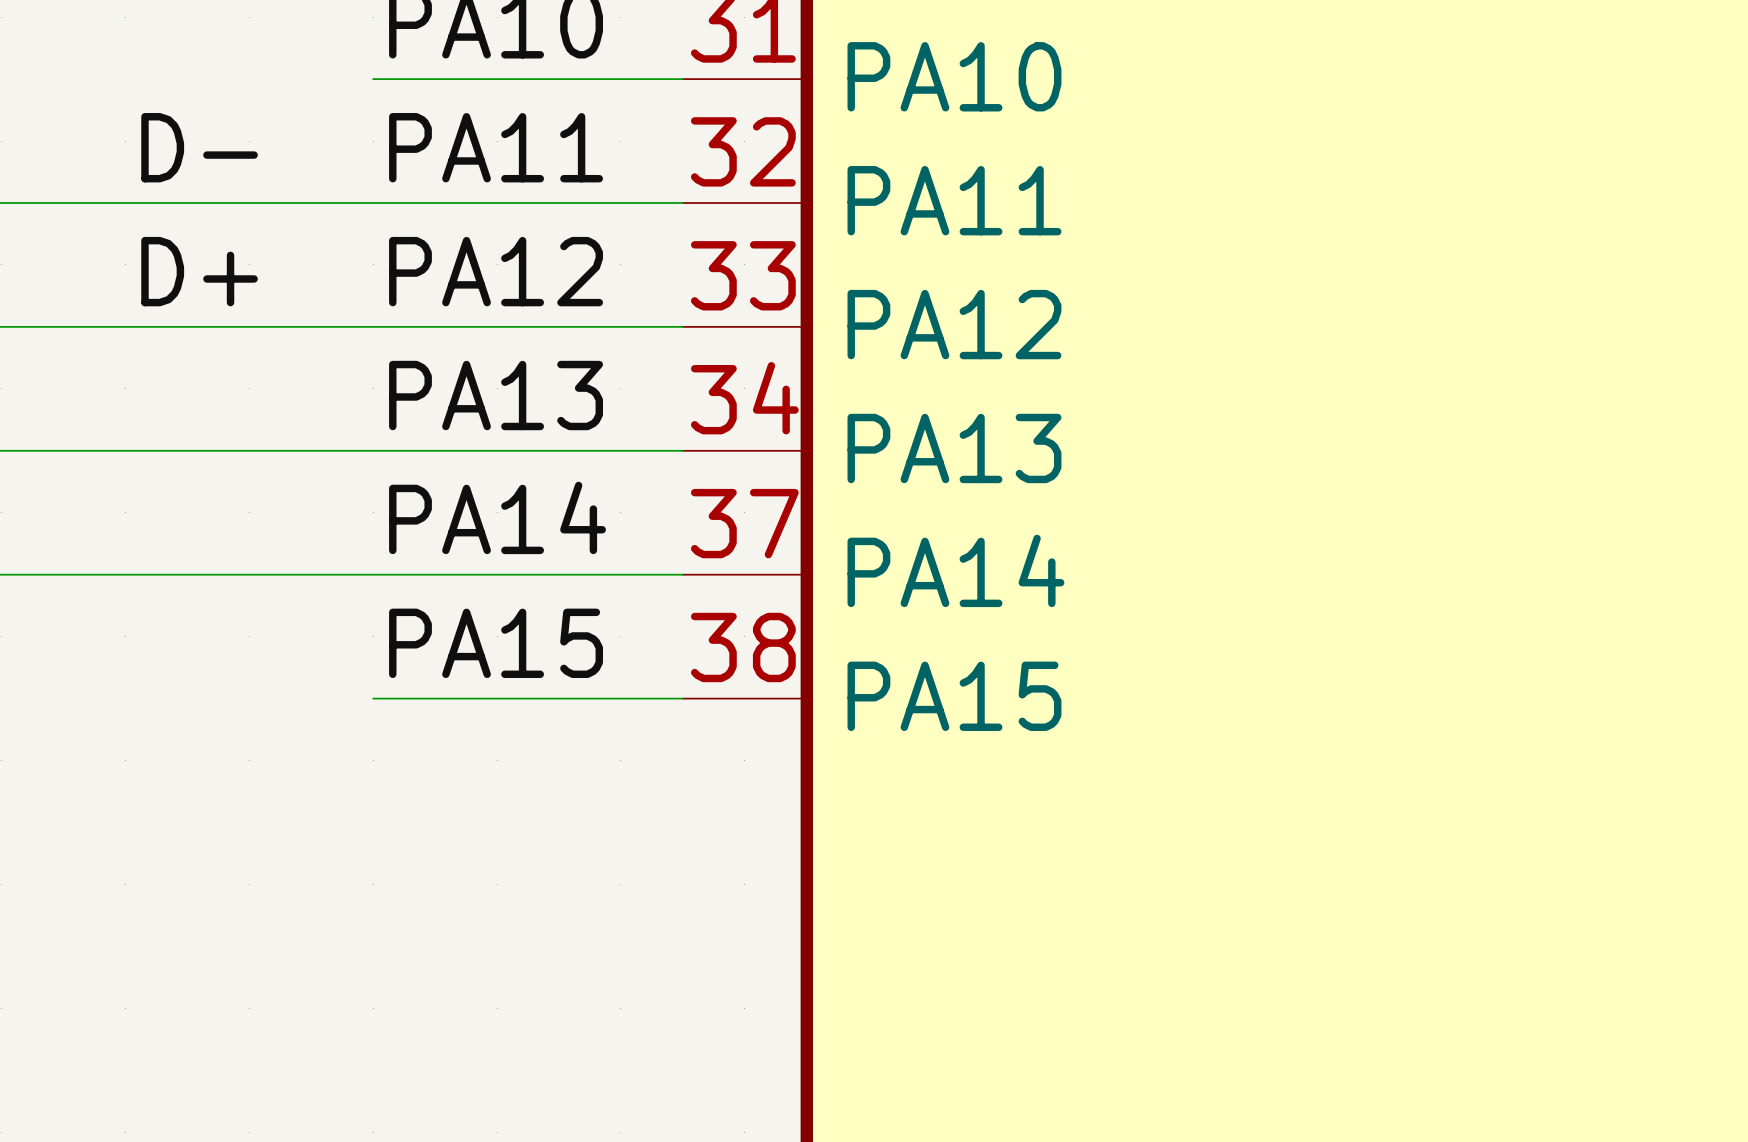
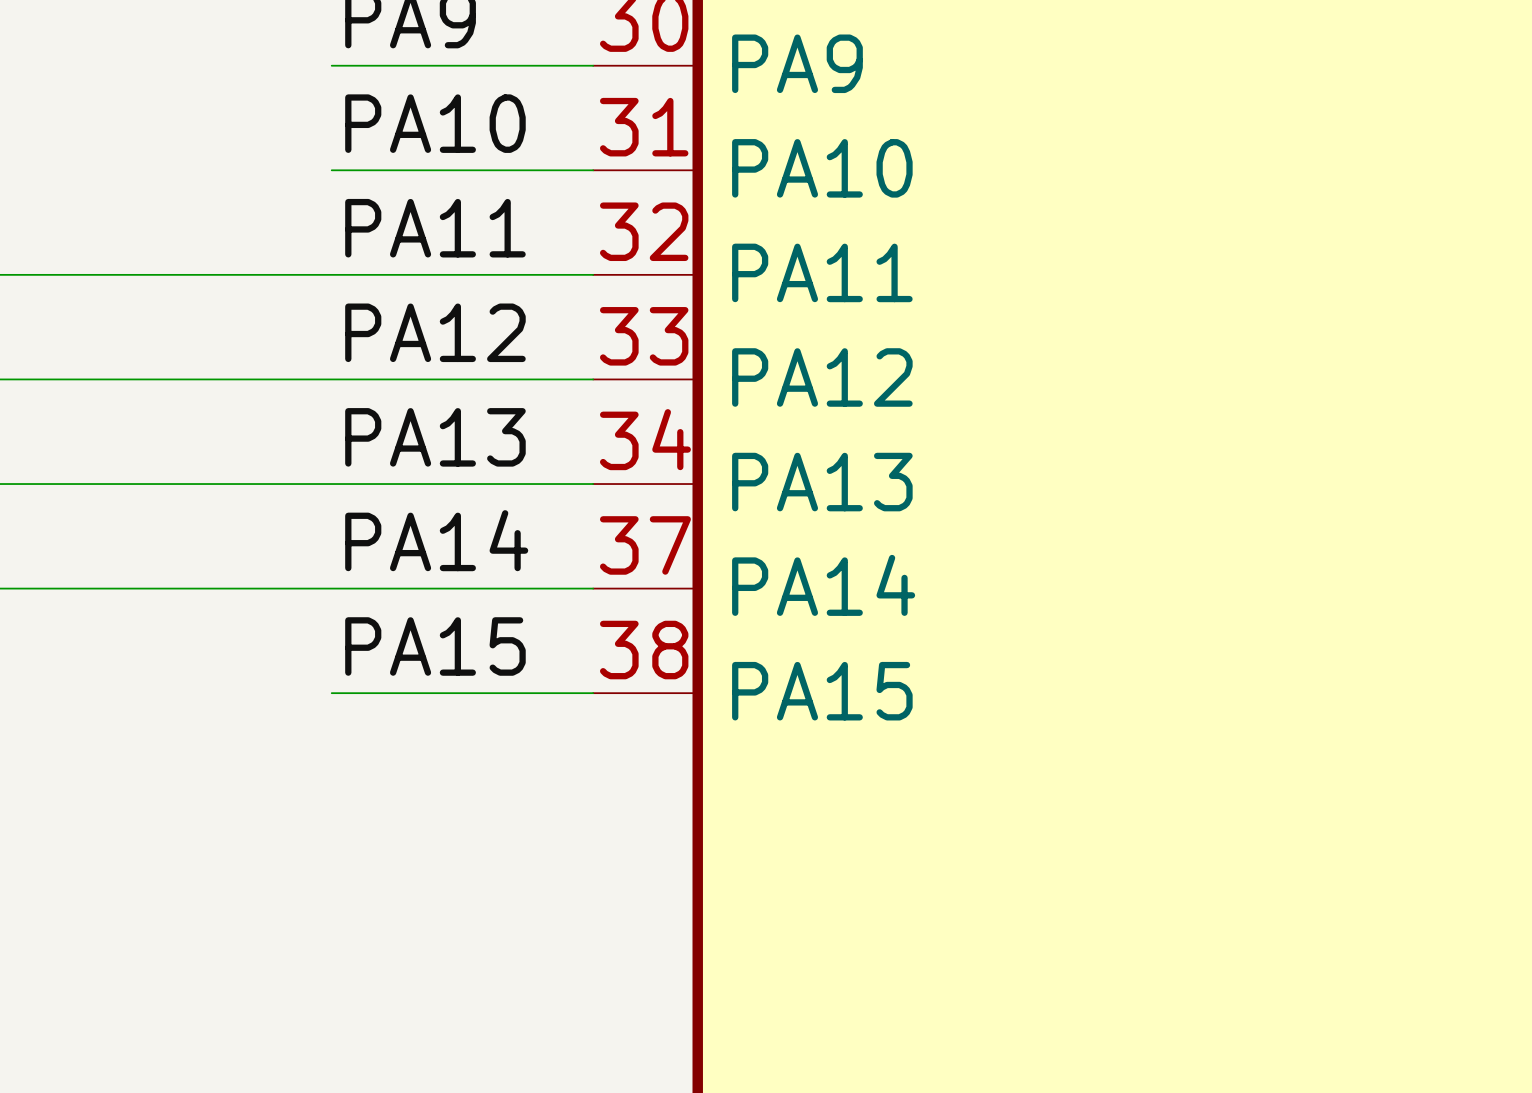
label: D- (199, 147) -> none
label: D+ (199, 271) -> none

